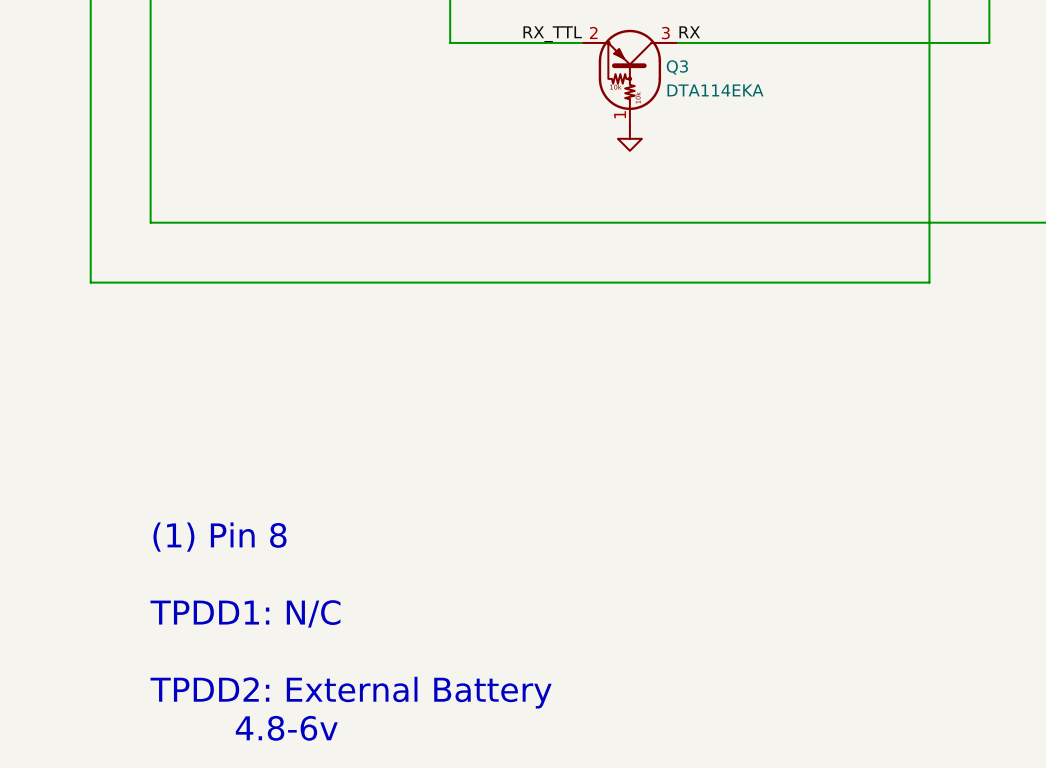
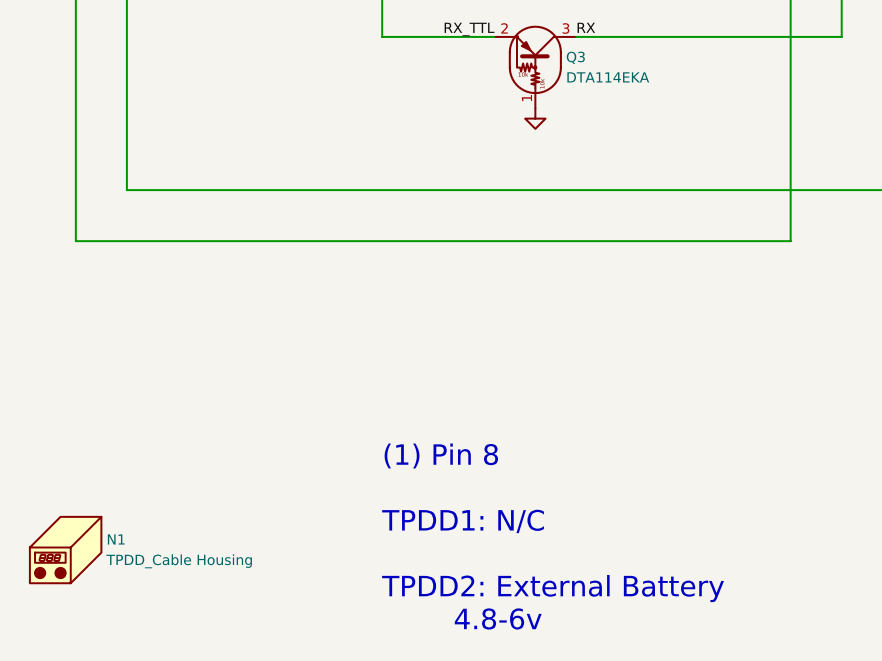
text: none -> (1) Pin 8 (441, 455)
text: (1) Pin 8 (220, 537) -> none
text: none -> TPDD1: N/C (463, 521)
text: TPDD1: N/C (245, 613) -> none
N1: none -> TPDD_Cable Housing (65, 550)
text: none -> TPDD2: External Battery (553, 588)
text: TPDD2: External Battery (351, 692) -> none
text: none -> 4.8-6v (498, 618)
text: 4.8-6v (286, 728) -> none

